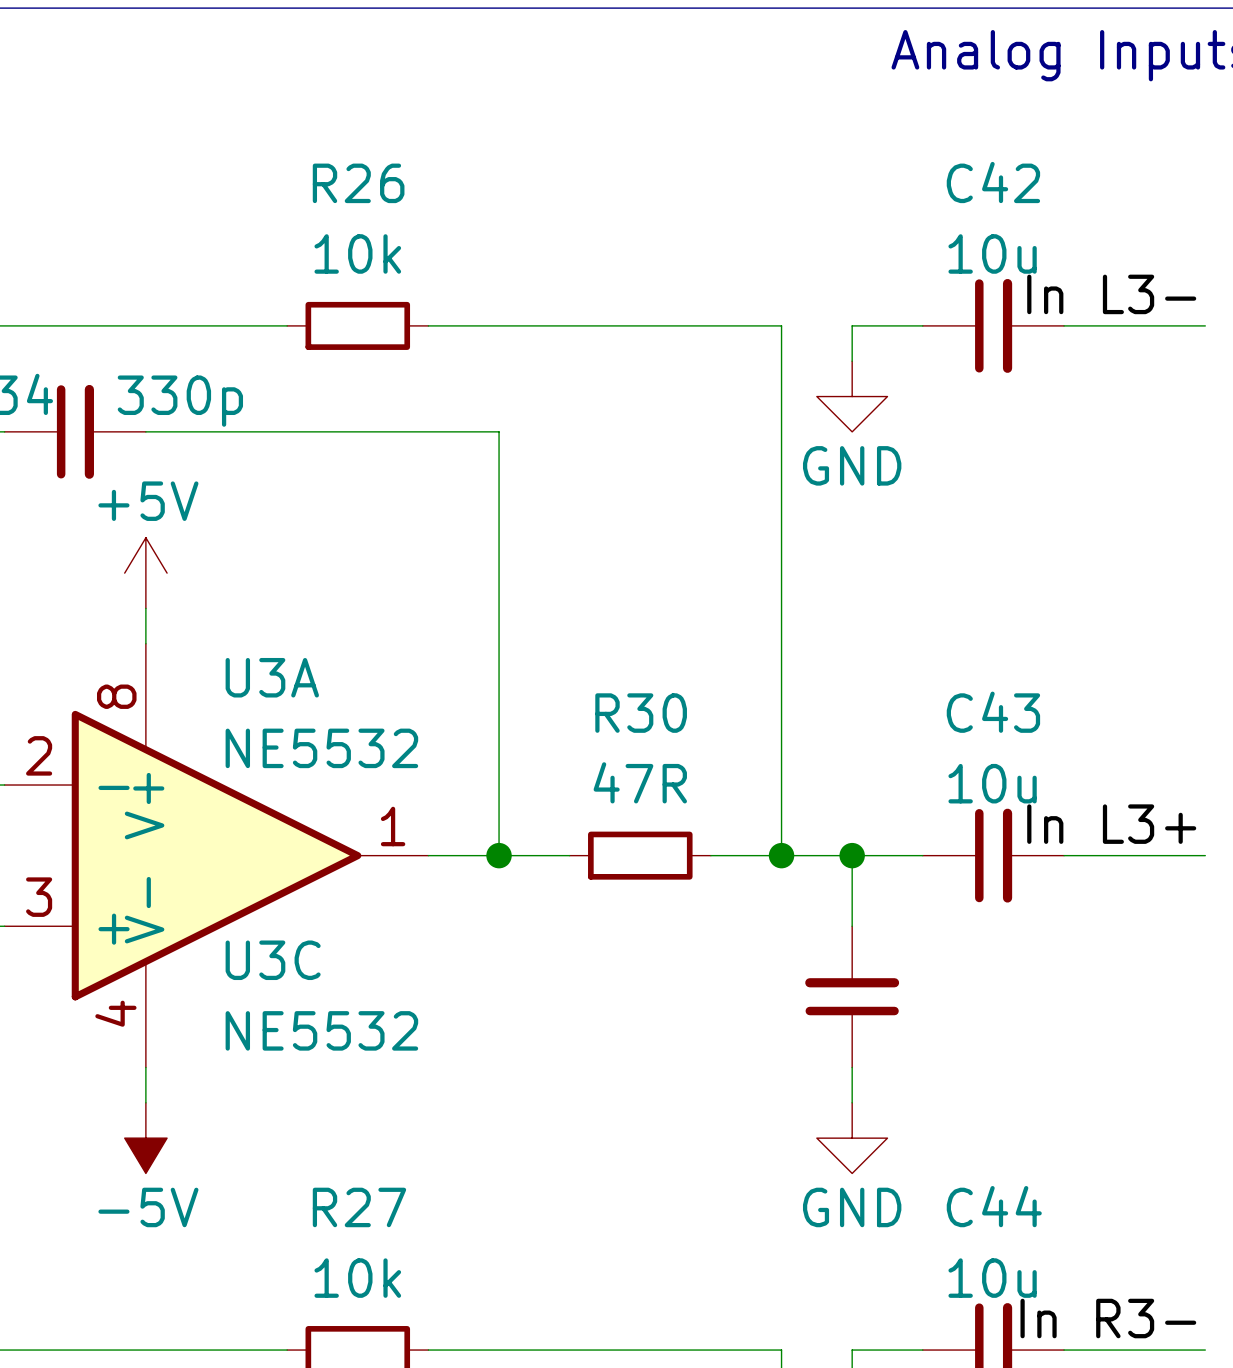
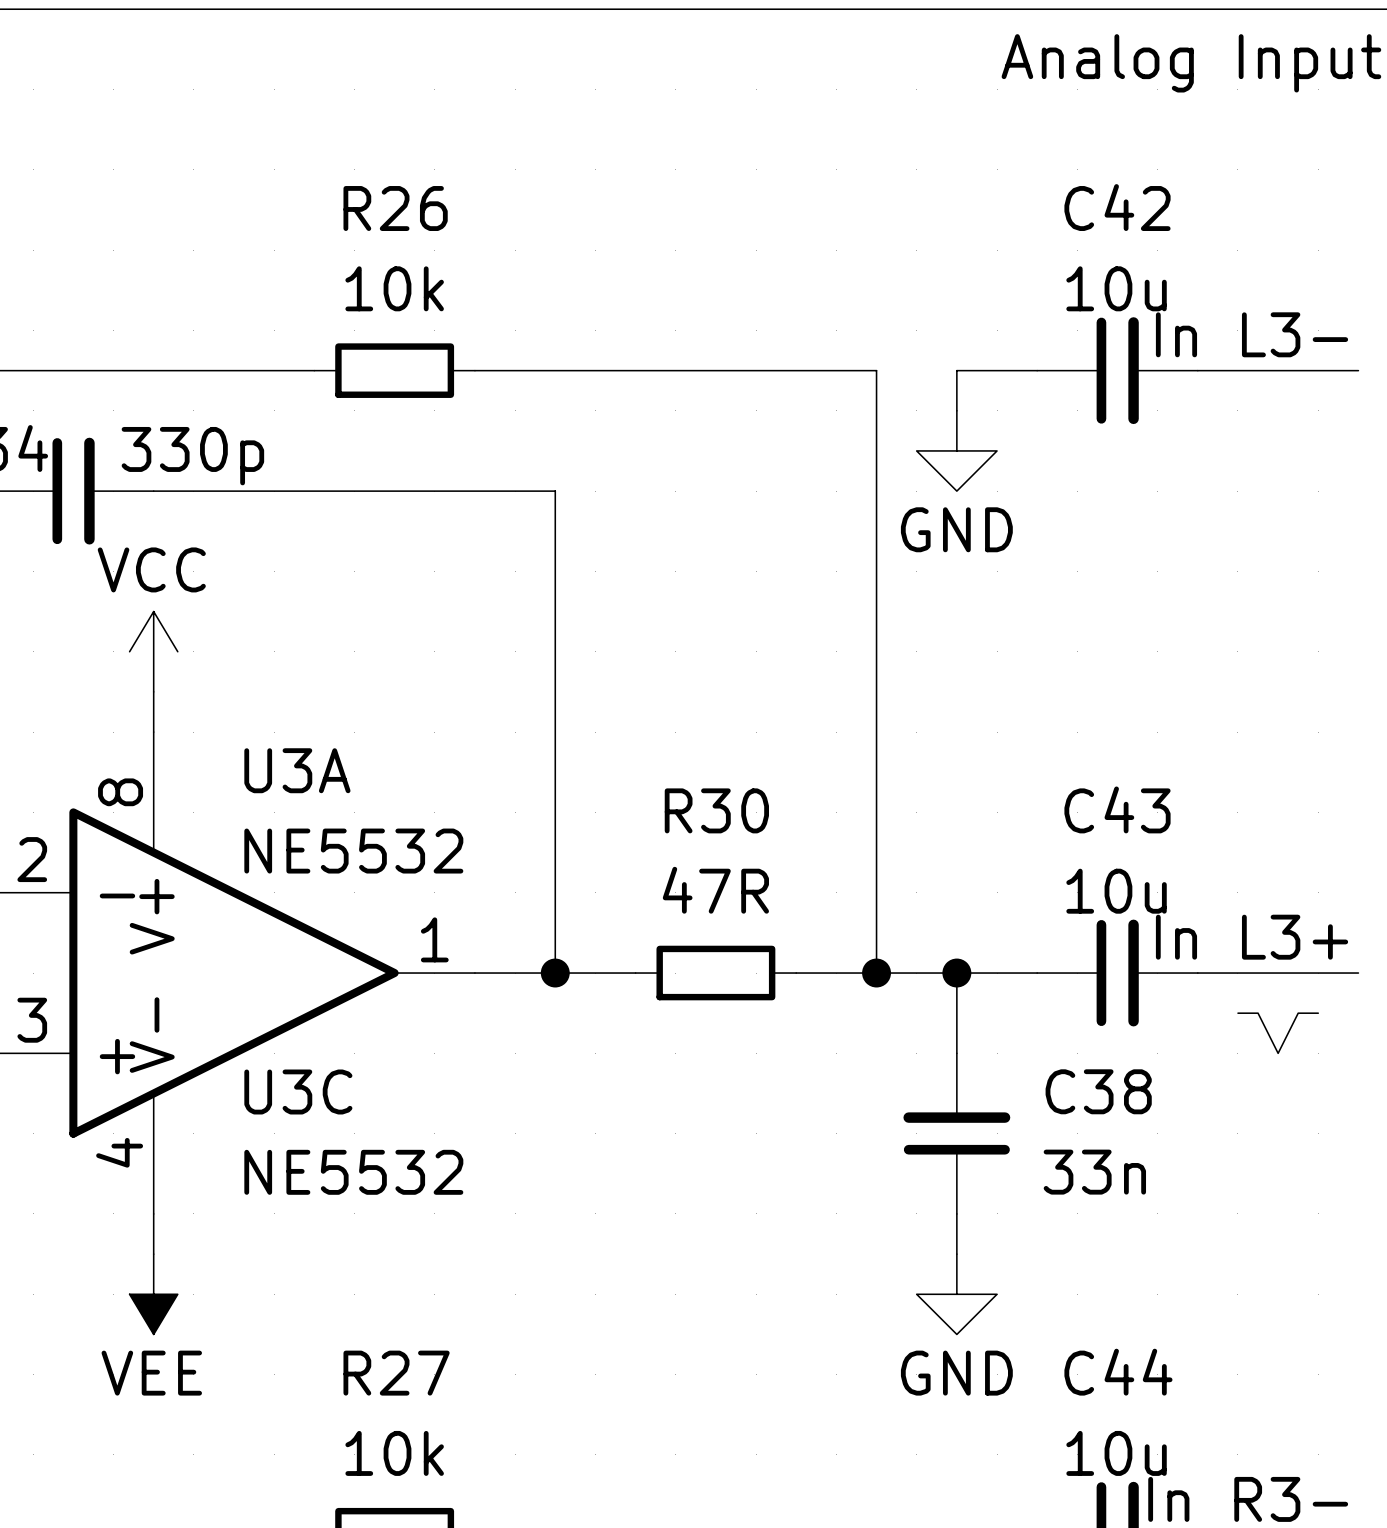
power symbol: +5V (145, 573) -> VCC (153, 651)
part: none -> (1278, 1033)
C38 name: none -> C38 (1098, 1091)
C38 value: none -> 33n (1094, 1172)
power symbol: -5V (145, 1138) -> VEE (153, 1294)

